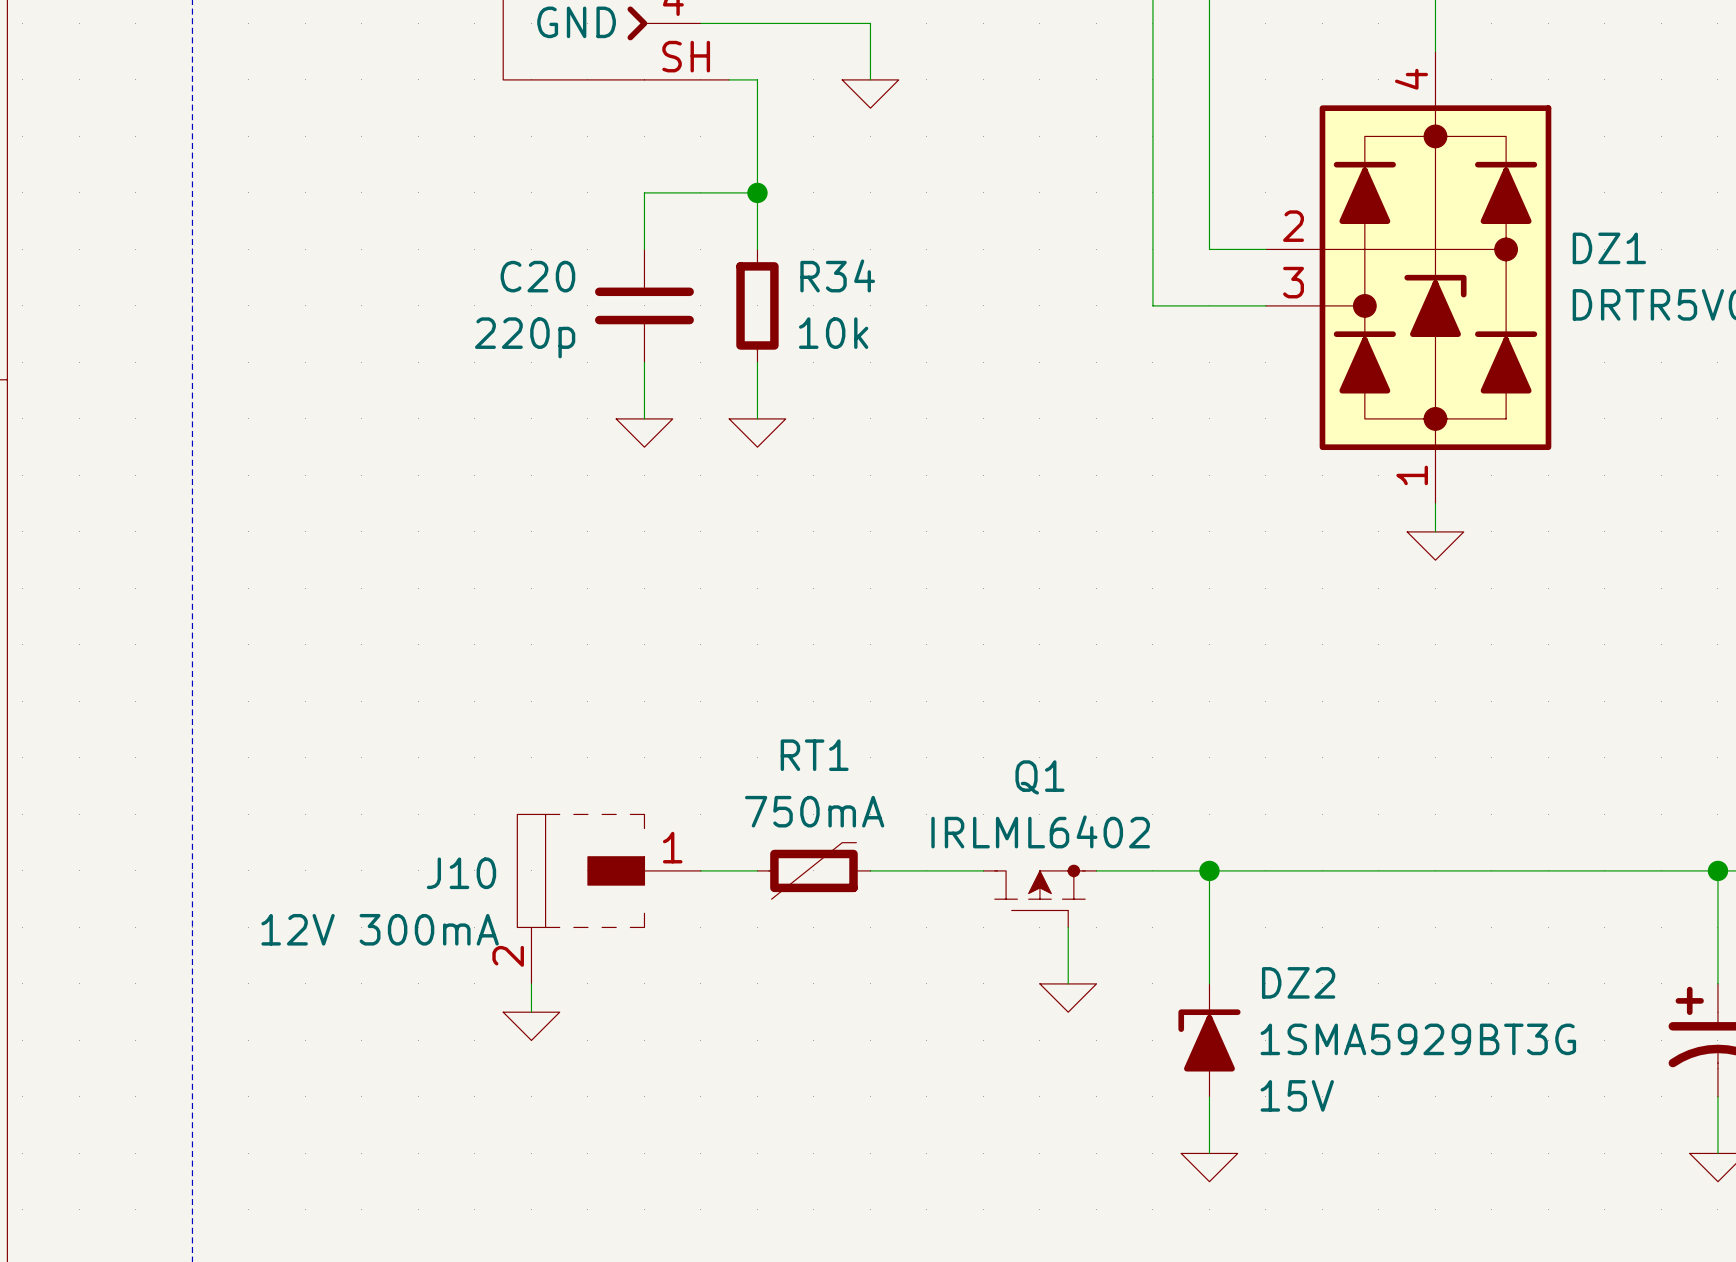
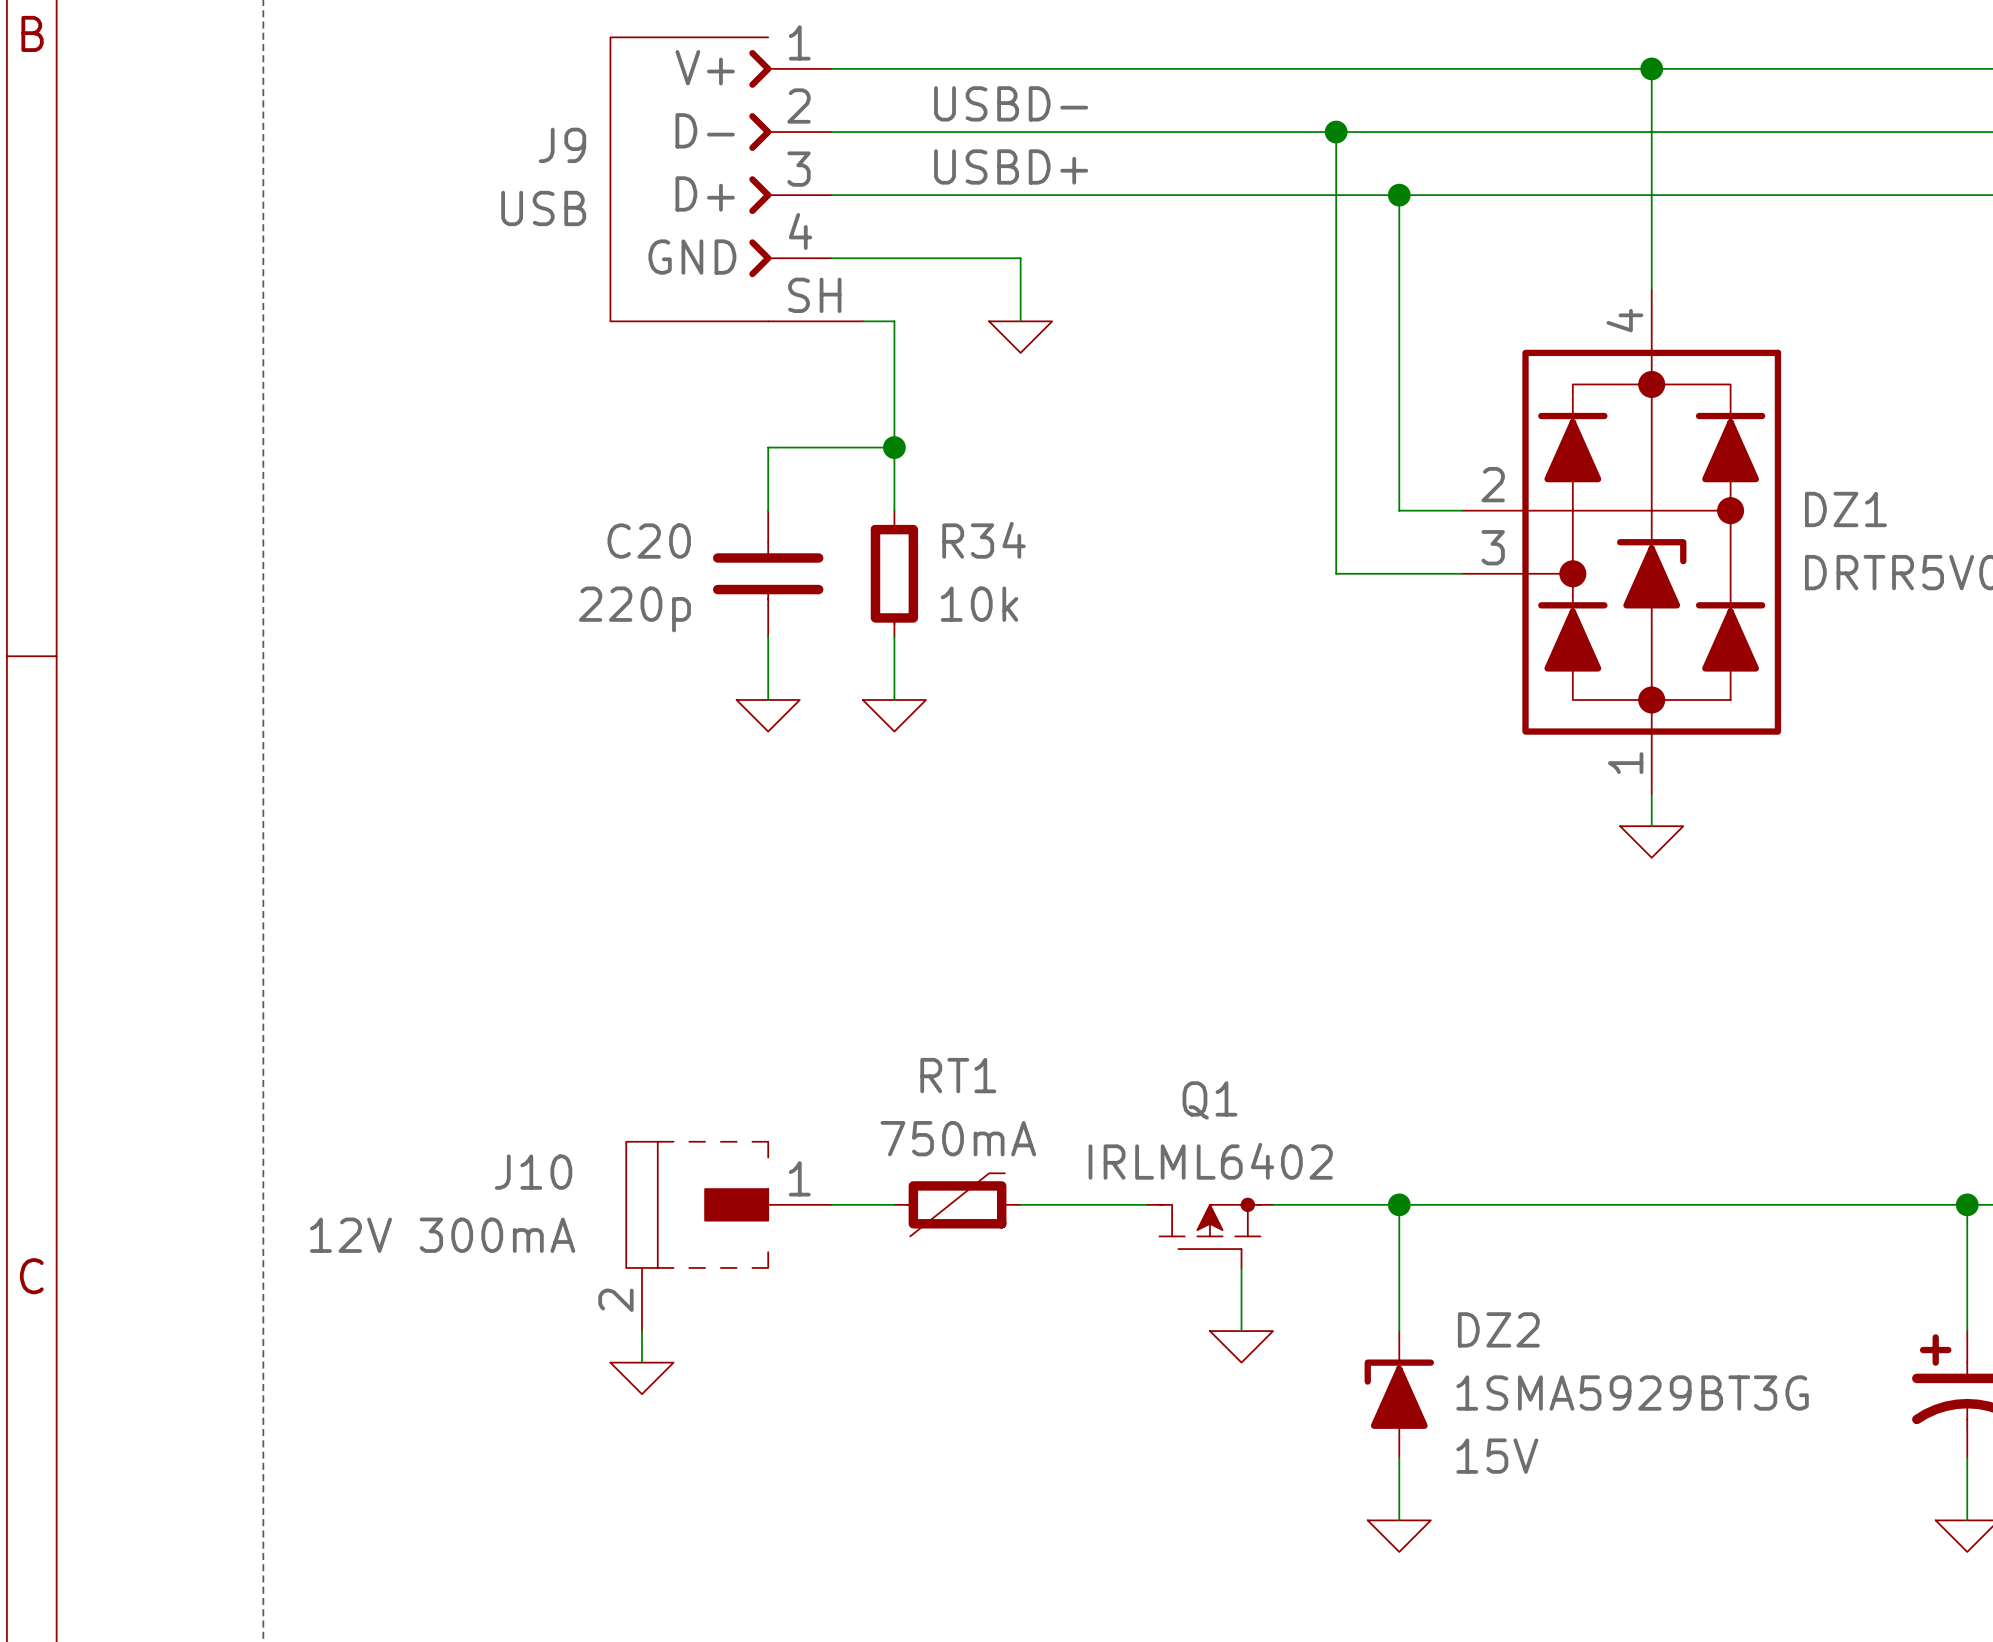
J10 name position: J10 (461, 873) -> J10 (533, 1172)
J10 value position: 12V 300mA (380, 929) -> 12V 300mA (442, 1235)

